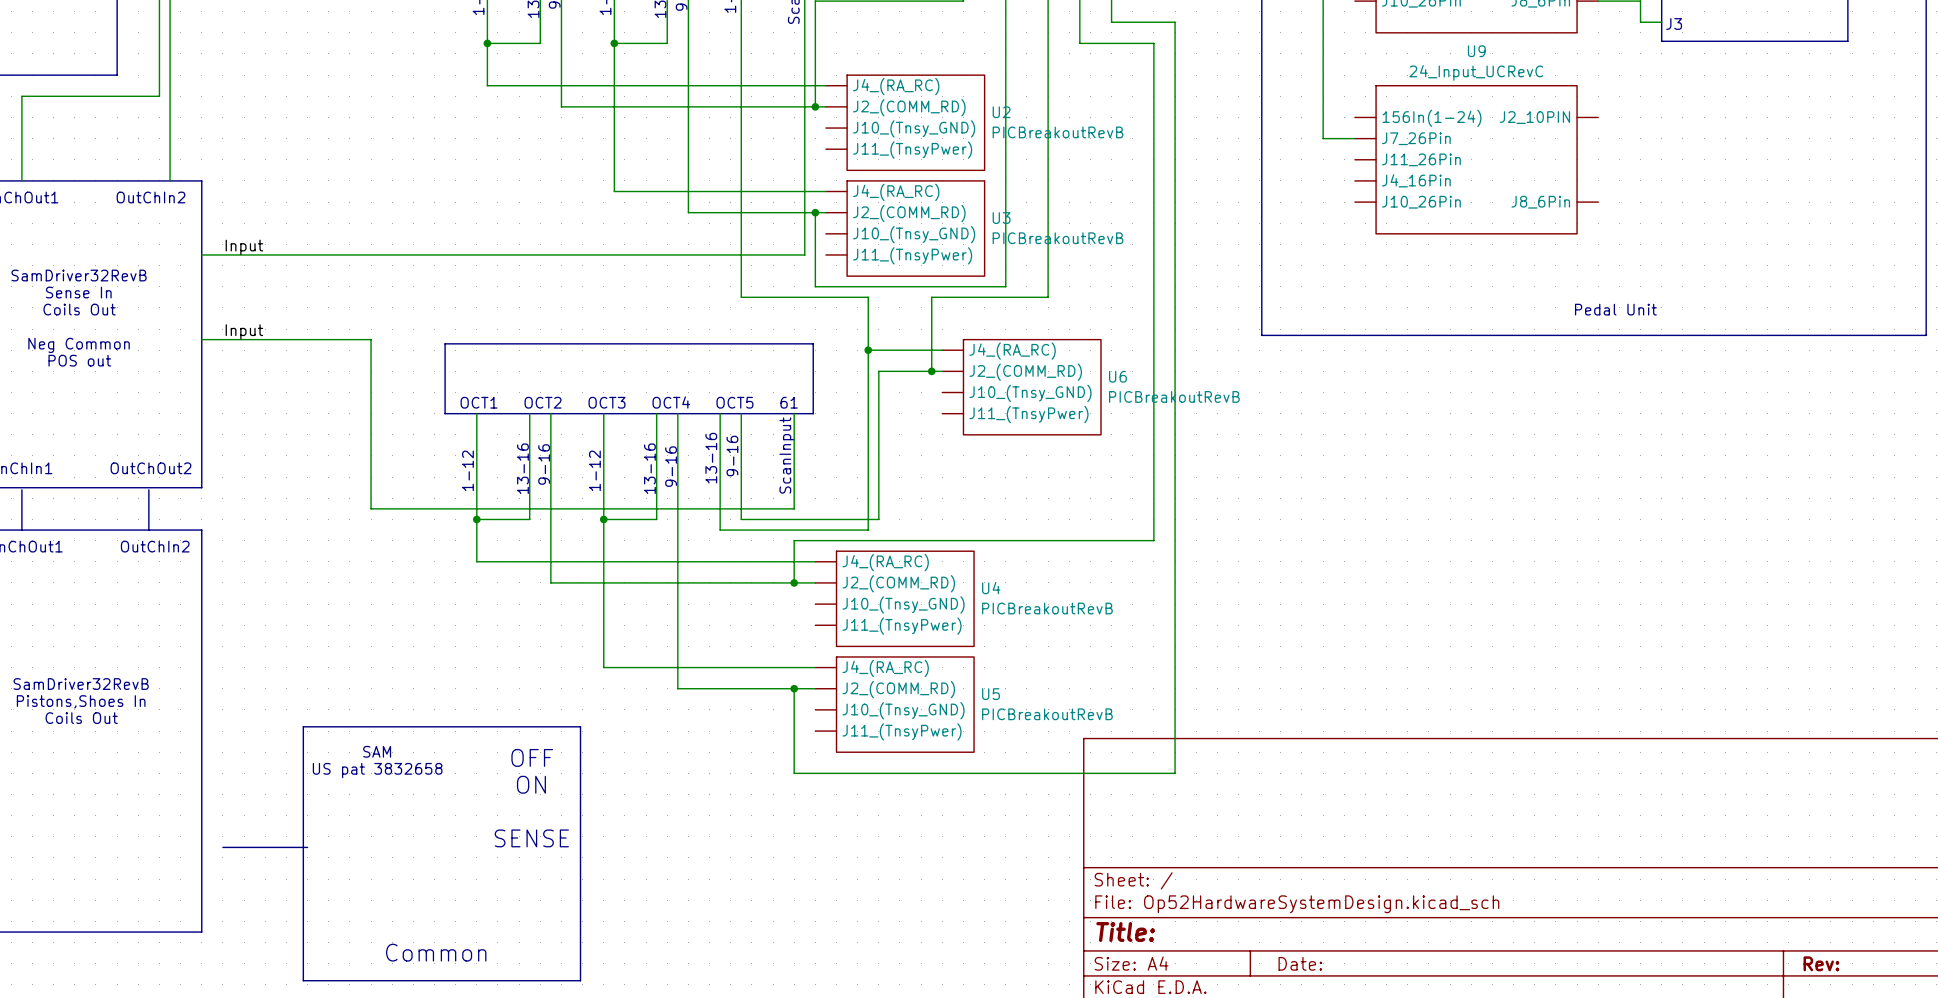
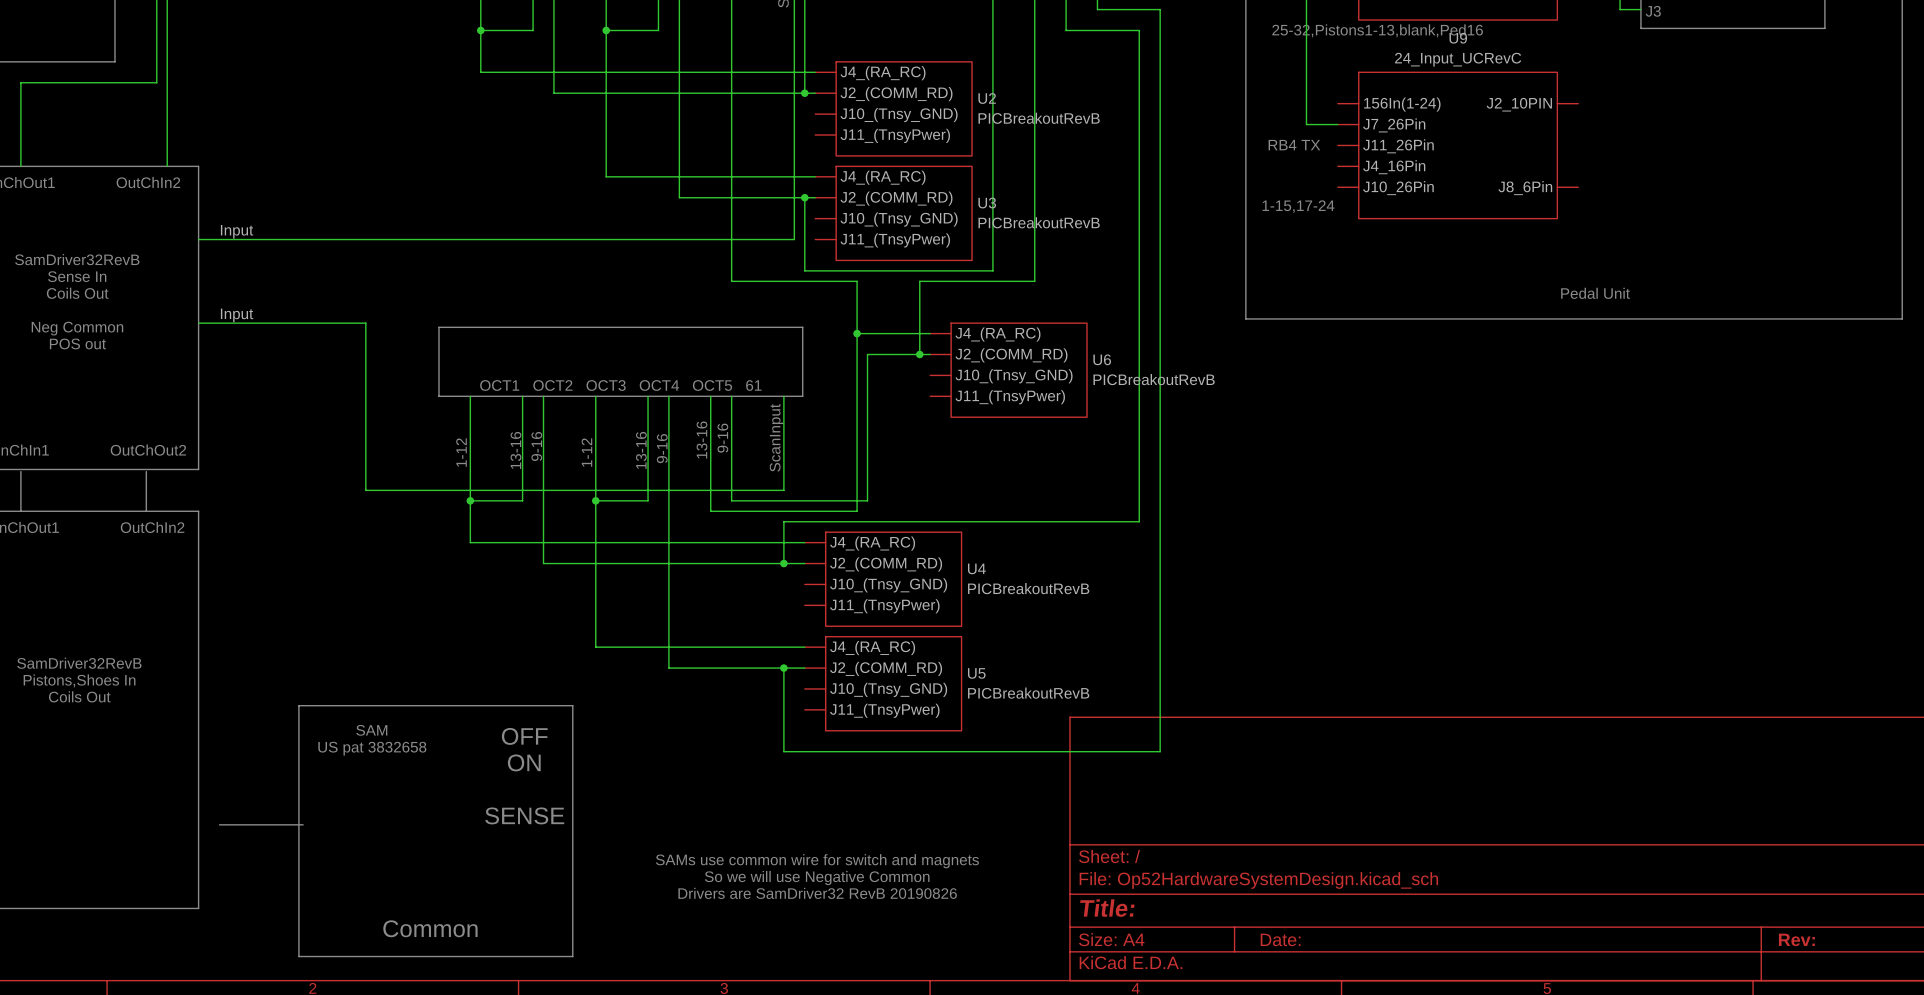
text: none -> 25-32,Pistons1-13,blank,Ped16 (1377, 30)
text: none -> RB4 TX (1294, 145)
text: none -> 1-15,17-24 (1298, 206)
text: none -> SAMs use common wire for switch and magnets (817, 861)
text: none -> So we will use Negative Common (817, 878)
text: none -> Drivers are SamDriver32 RevB 20190826 (817, 893)

